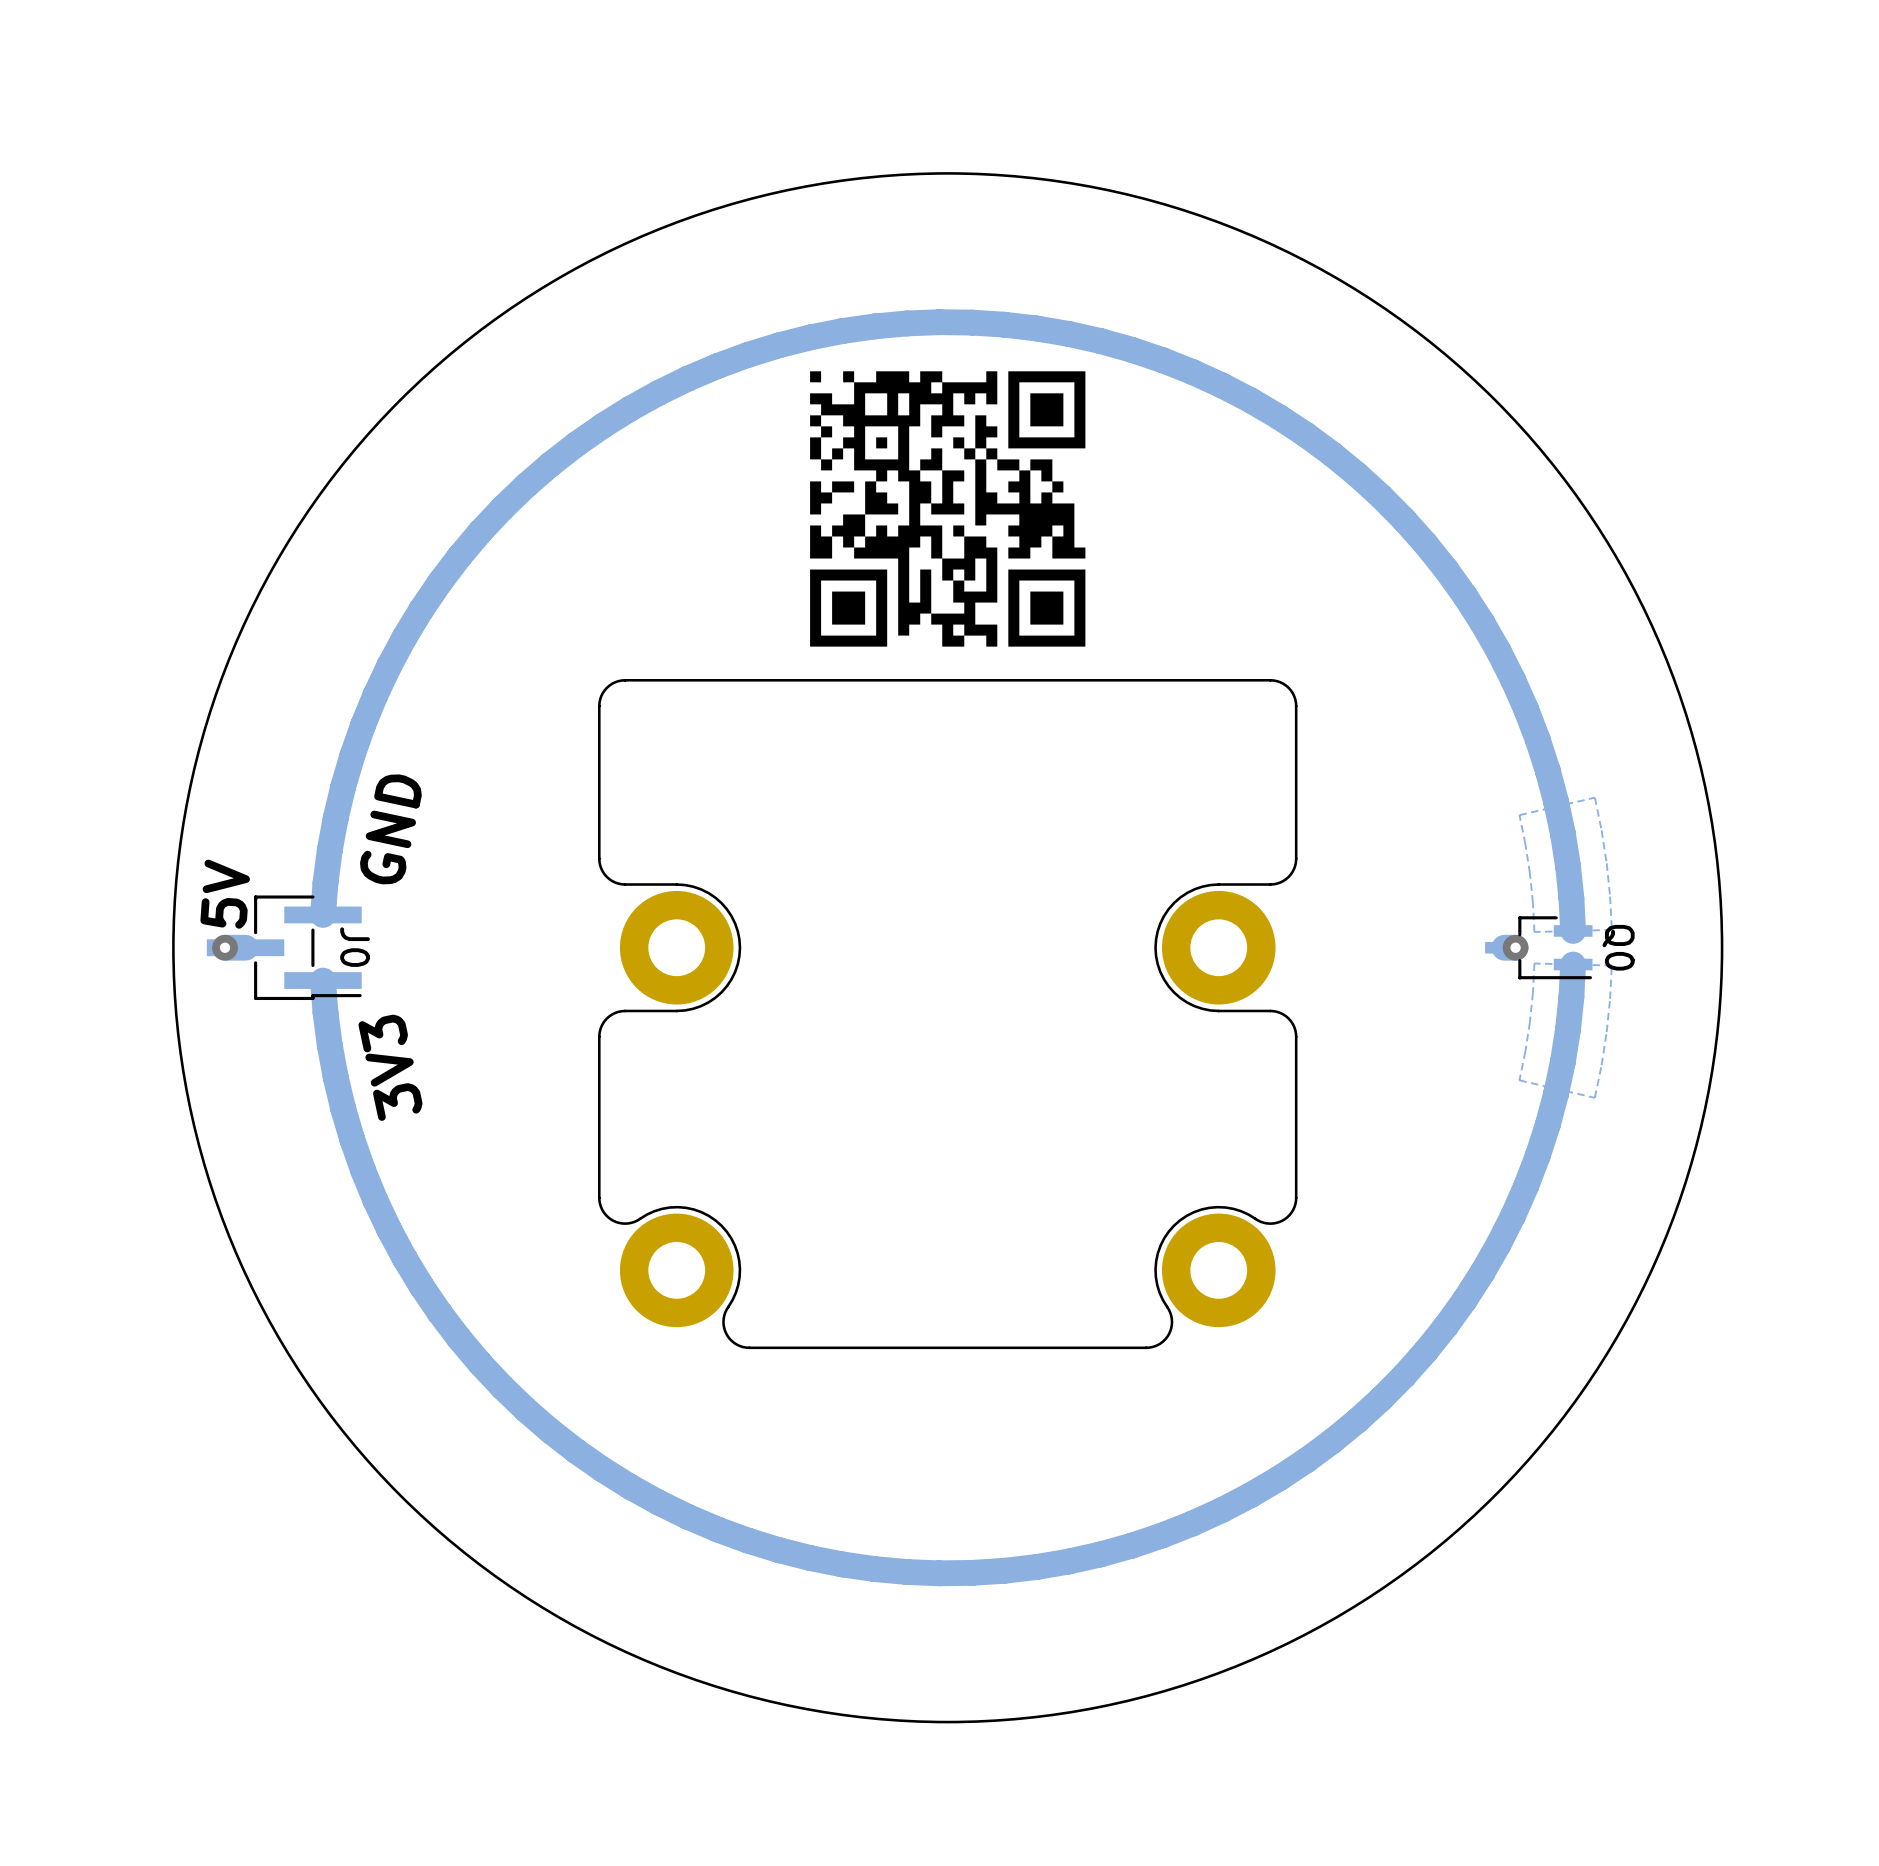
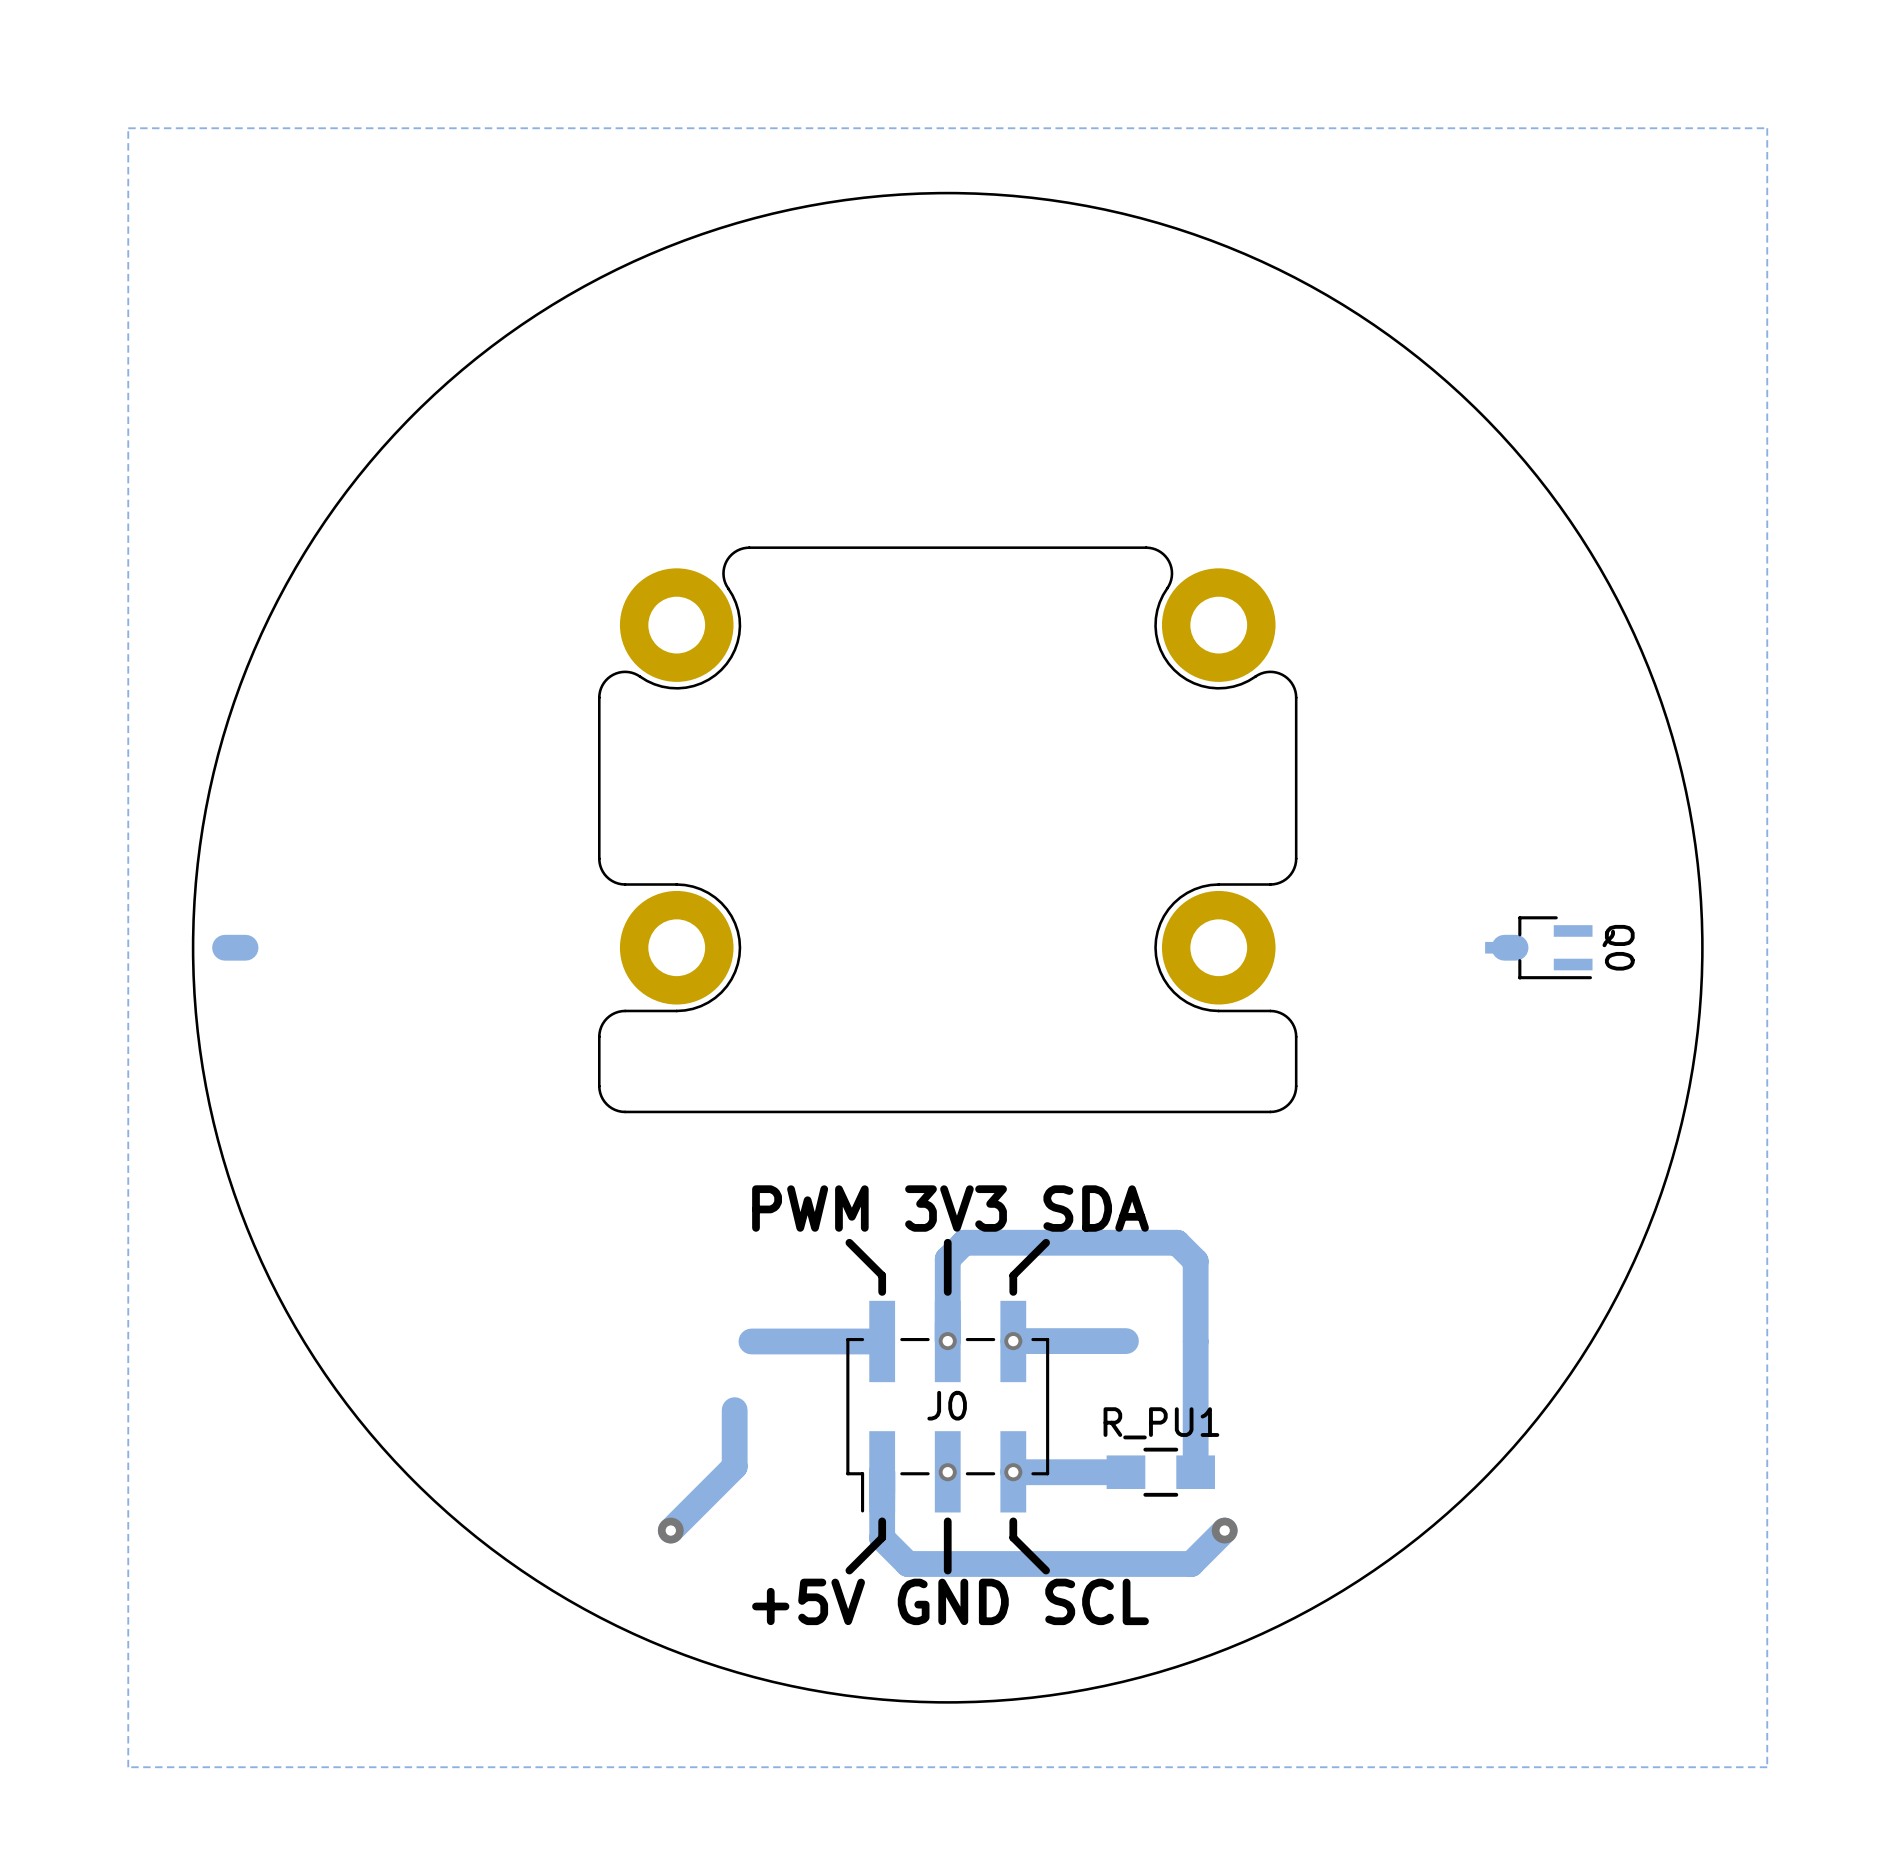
zone outline: none -> (1767, 128) (1767, 1767) (128, 1767) (128, 128) (1767, 128)
round board edge size: [172, 172, 1724, 1724] -> [191, 191, 1704, 1704]
drawing: [810, 371, 1086, 647] -> none
part: none -> (676, 625)
part: none -> (1218, 625)
board edge: (1296, 706) (1294, 696) (1288, 687) (1280, 682) (1270, 680) (625, 680) (615, 682) (606, 687) (601, 696) (599, 706) -> (1296, 706) (1293, 685) (1287, 678) (1276, 672) (1263, 672) (1241, 684) (1217, 688) (1193, 683) (1174, 669) (1160, 649) (1155, 626) (1159, 602) (1171, 579) (1171, 567) (1163, 554) (1152, 548) (749, 547) (734, 552) (727, 558) (724, 567) (724, 579) (735, 602) (739, 626) (734, 649) (721, 669) (701, 683) (677, 688) (654, 684) (631, 672) (619, 672) (608, 678) (602, 685) (599, 706)
zone outline: (1594, 797) (1519, 815) (1529, 873) (1534, 932) (1611, 929) (1606, 863) (1594, 797) -> none
text: GND (390, 829) -> none
text: 5V (225, 894) -> none
J0 footprint: [206, 895, 362, 1001] -> [846, 1300, 1050, 1513]
track: (322, 914) (329, 850) (343, 786) (363, 725) (375, 695) (404, 637) (439, 582) (480, 531) (525, 485) (576, 444) (602, 425) (658, 392) (717, 365) (779, 345) (842, 331) (907, 323) (971, 322) (1036, 328) (1100, 341) (1162, 360) (1192, 372) (1222, 385) (1278, 416) (1332, 454) (1381, 496) (1425, 543) (1464, 595) (1482, 622) (1513, 680) (1537, 740) (1556, 802) (1568, 866) (1573, 930) -> none
via: (225, 947) -> none
J0 name position: J0 (355, 947) -> J0 (947, 1405)
via: (1515, 947) -> none
zone outline: (1534, 963) (1529, 1022) (1519, 1080) (1594, 1097) (1606, 1032) (1611, 965) (1534, 963) -> none
track: (1573, 964) (1568, 1029) (1556, 1093) (1537, 1155) (1513, 1215) (1482, 1272) (1464, 1299) (1425, 1351) (1381, 1398) (1332, 1441) (1278, 1478) (1222, 1509) (1192, 1523) (1162, 1535) (1100, 1554) (1036, 1567) (971, 1572) (907, 1572) (842, 1564) (779, 1550) (717, 1529) (658, 1502) (602, 1469) (576, 1451) (525, 1409) (480, 1363) (439, 1312) (404, 1258) (375, 1200) (363, 1170) (343, 1108) (329, 1045) (322, 980) -> none
text: 3V3 (390, 1067) -> none
board edge: (1296, 1086) (1296, 1197) (1293, 1209) (1284, 1219) (1270, 1223) (1260, 1221) (1233, 1208) (1209, 1207) (1186, 1215) (1174, 1225) (1160, 1245) (1155, 1269) (1159, 1292) (1171, 1315) (1171, 1327) (1167, 1336) (1160, 1343) (1146, 1347) (749, 1347) (737, 1344) (727, 1336) (723, 1321) (725, 1312) (738, 1285) (739, 1261) (731, 1238) (721, 1225) (708, 1215) (686, 1207) (661, 1208) (634, 1221) (625, 1223) (613, 1220) (602, 1209) (599, 1197) (599, 1086) -> (1296, 1086) (1294, 1096) (1288, 1104) (1280, 1109) (1270, 1111) (625, 1111) (615, 1109) (606, 1104) (601, 1096) (599, 1086)
text: none -> PWM 3V3 SDA (950, 1208)
line: none -> (849, 1242) (882, 1275) (882, 1291)
line: none -> (947, 1242) (947, 1291)
line: none -> (1046, 1242) (1013, 1275) (1013, 1291)
part: (676, 1270) -> none
part: (1218, 1270) -> none
track: none -> (881, 1341) (751, 1341)
via: none -> (947, 1341)
via: none -> (1013, 1341)
track: none -> (1125, 1341) (1013, 1341)
track: none -> (1195, 1341) (1195, 1261) (1177, 1242) (964, 1242) (947, 1259) (947, 1341)
track: none -> (1195, 1342) (1195, 1472)
track: none -> (734, 1410) (734, 1466) (670, 1530)
track: none -> (882, 1471) (882, 1538) (907, 1564) (1191, 1564) (1224, 1530)
via: none -> (947, 1472)
via: none -> (1013, 1472)
track: none -> (1125, 1472) (1013, 1472)
R_PU1: none -> (1160, 1472)
line: none -> (882, 1521) (882, 1537) (849, 1570)
line: none -> (947, 1521) (947, 1570)
line: none -> (1013, 1521) (1013, 1537) (1046, 1570)
via: none -> (670, 1530)
via: none -> (1224, 1530)
text: none -> +5V GND SCL (950, 1601)

